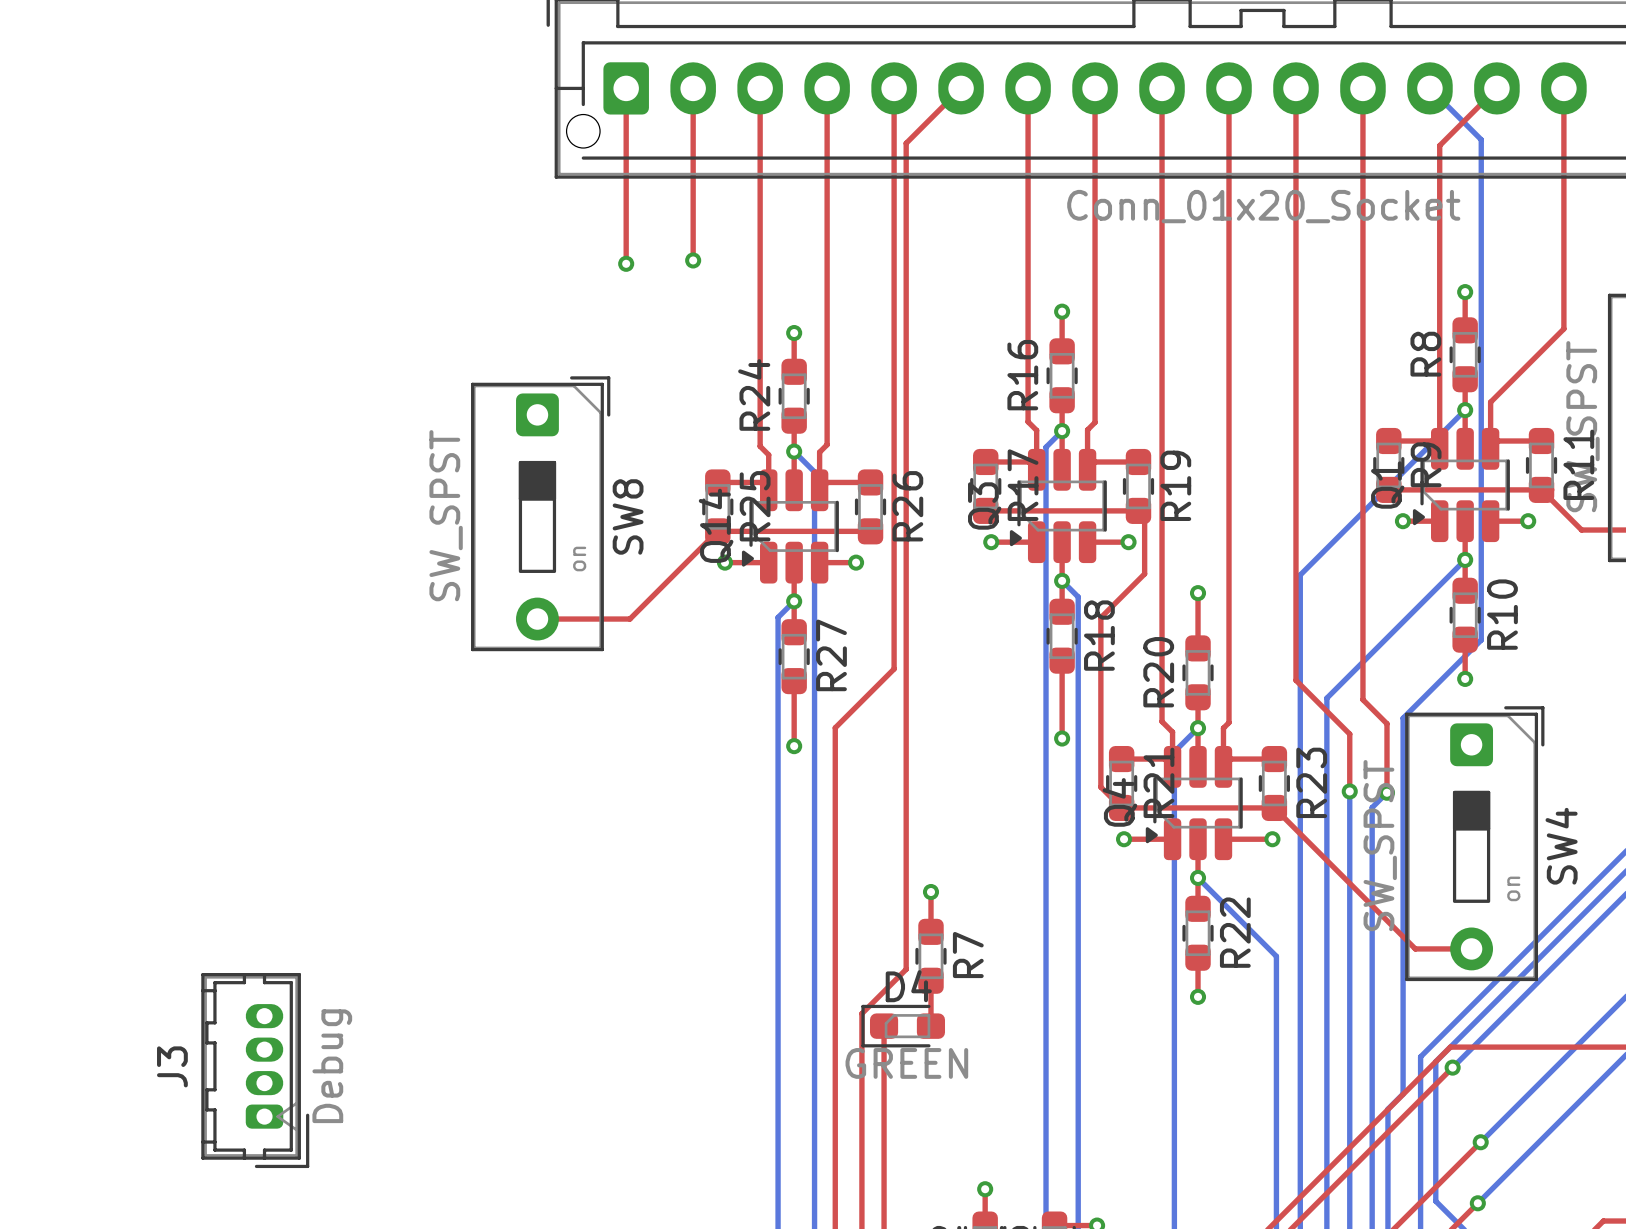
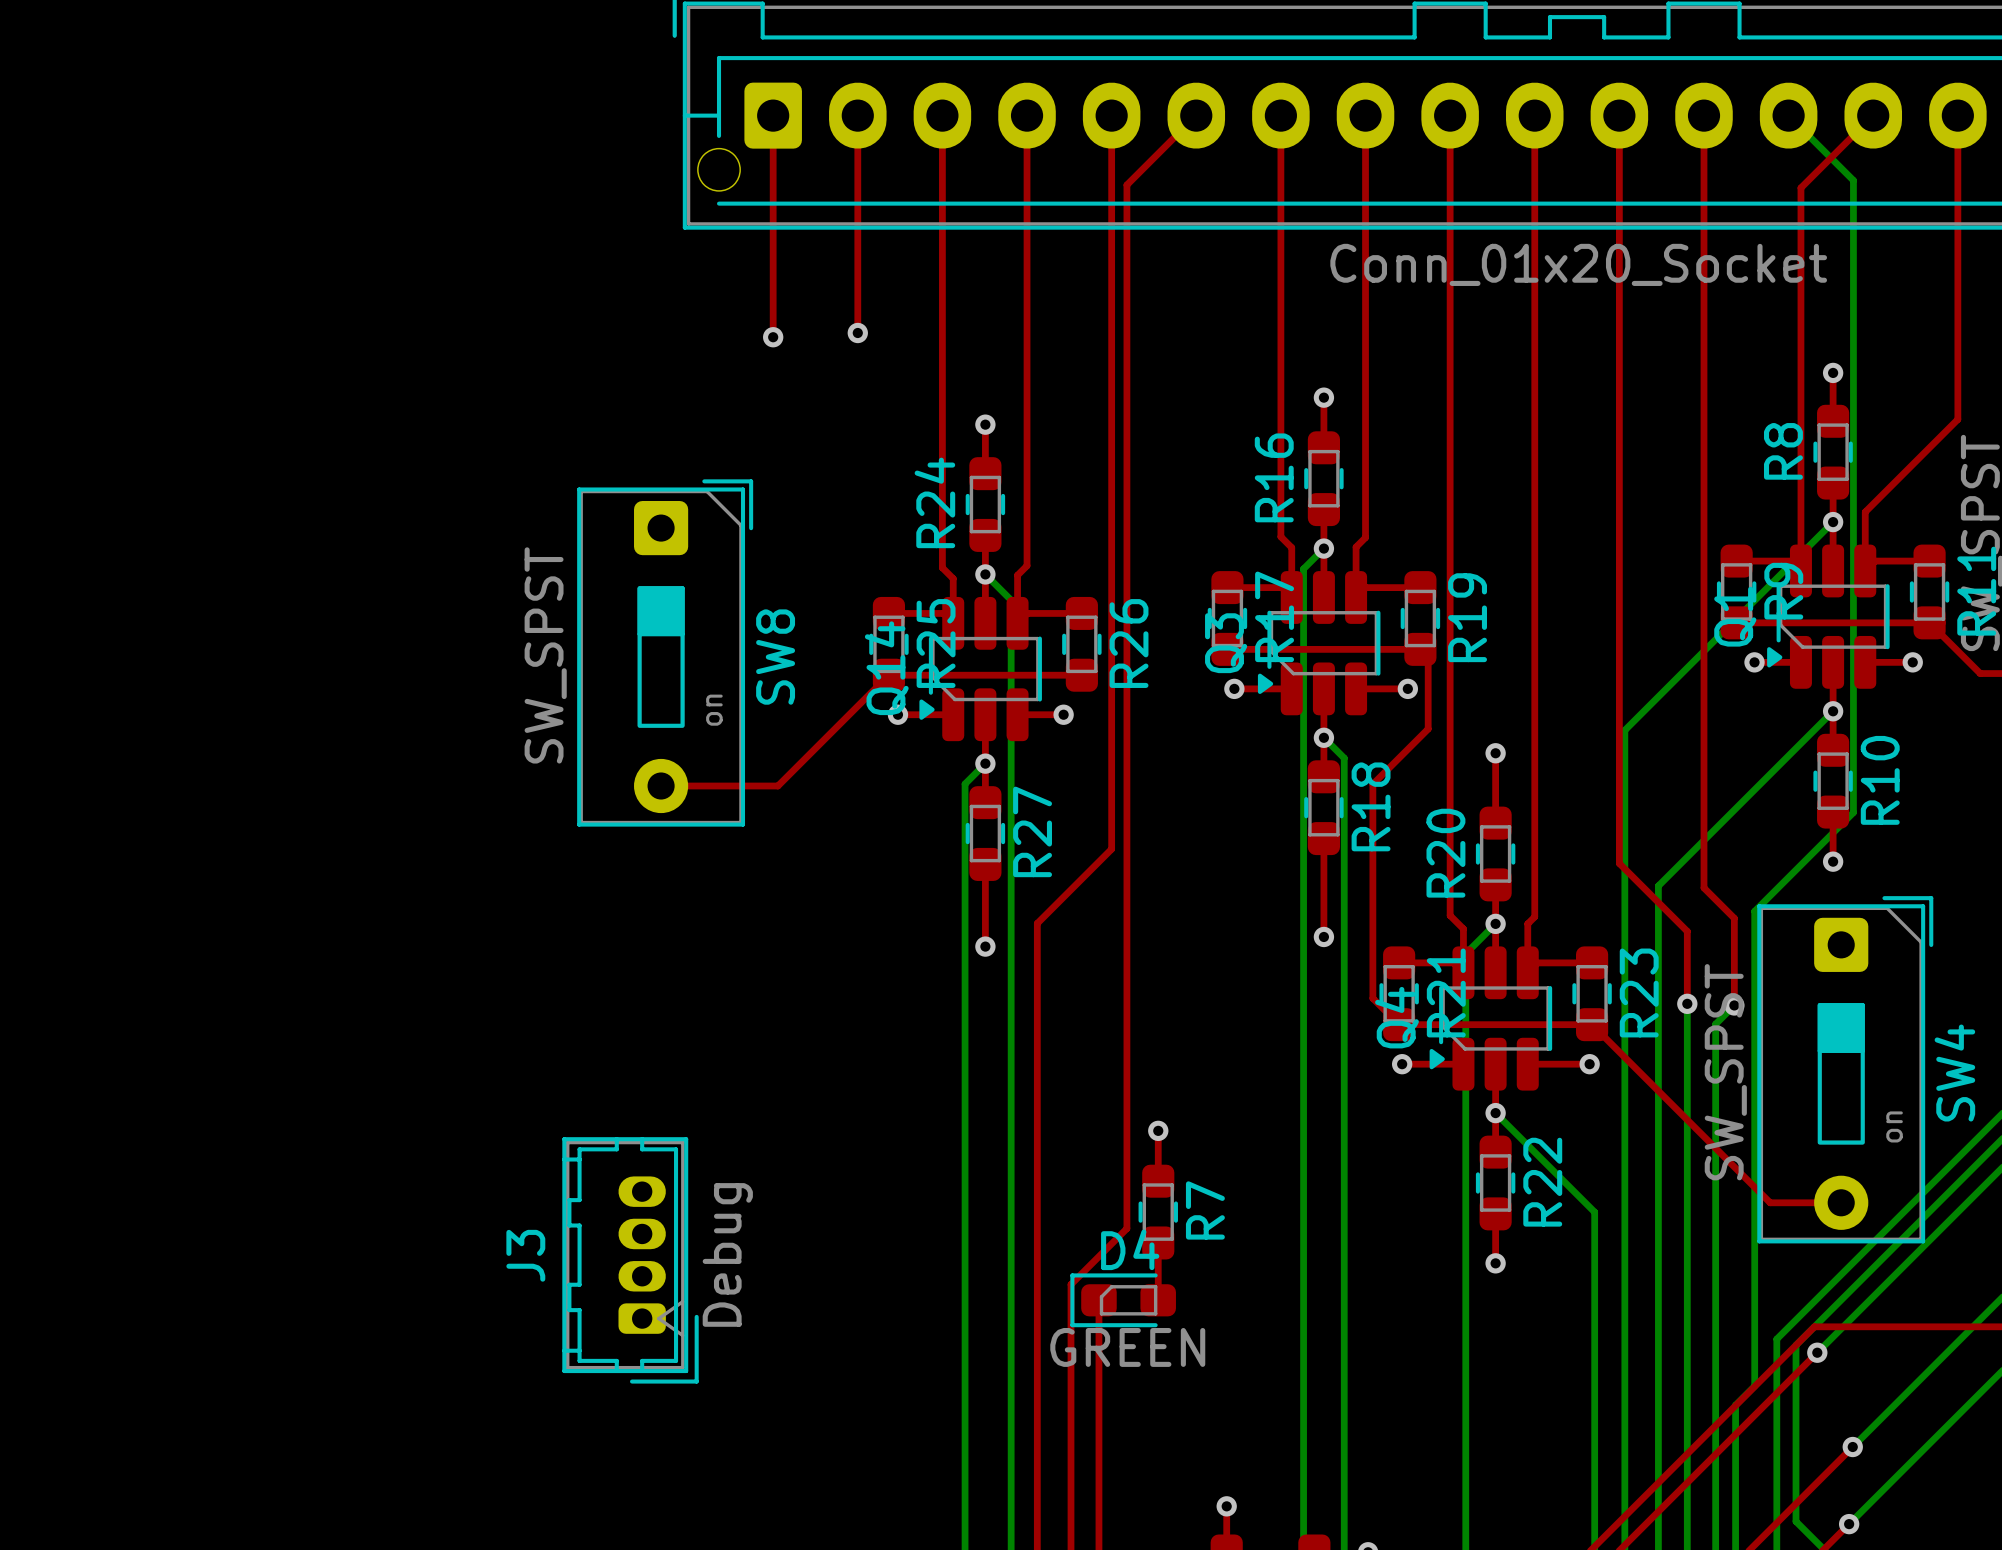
J3 position: (255, 1070) -> (630, 1260)

